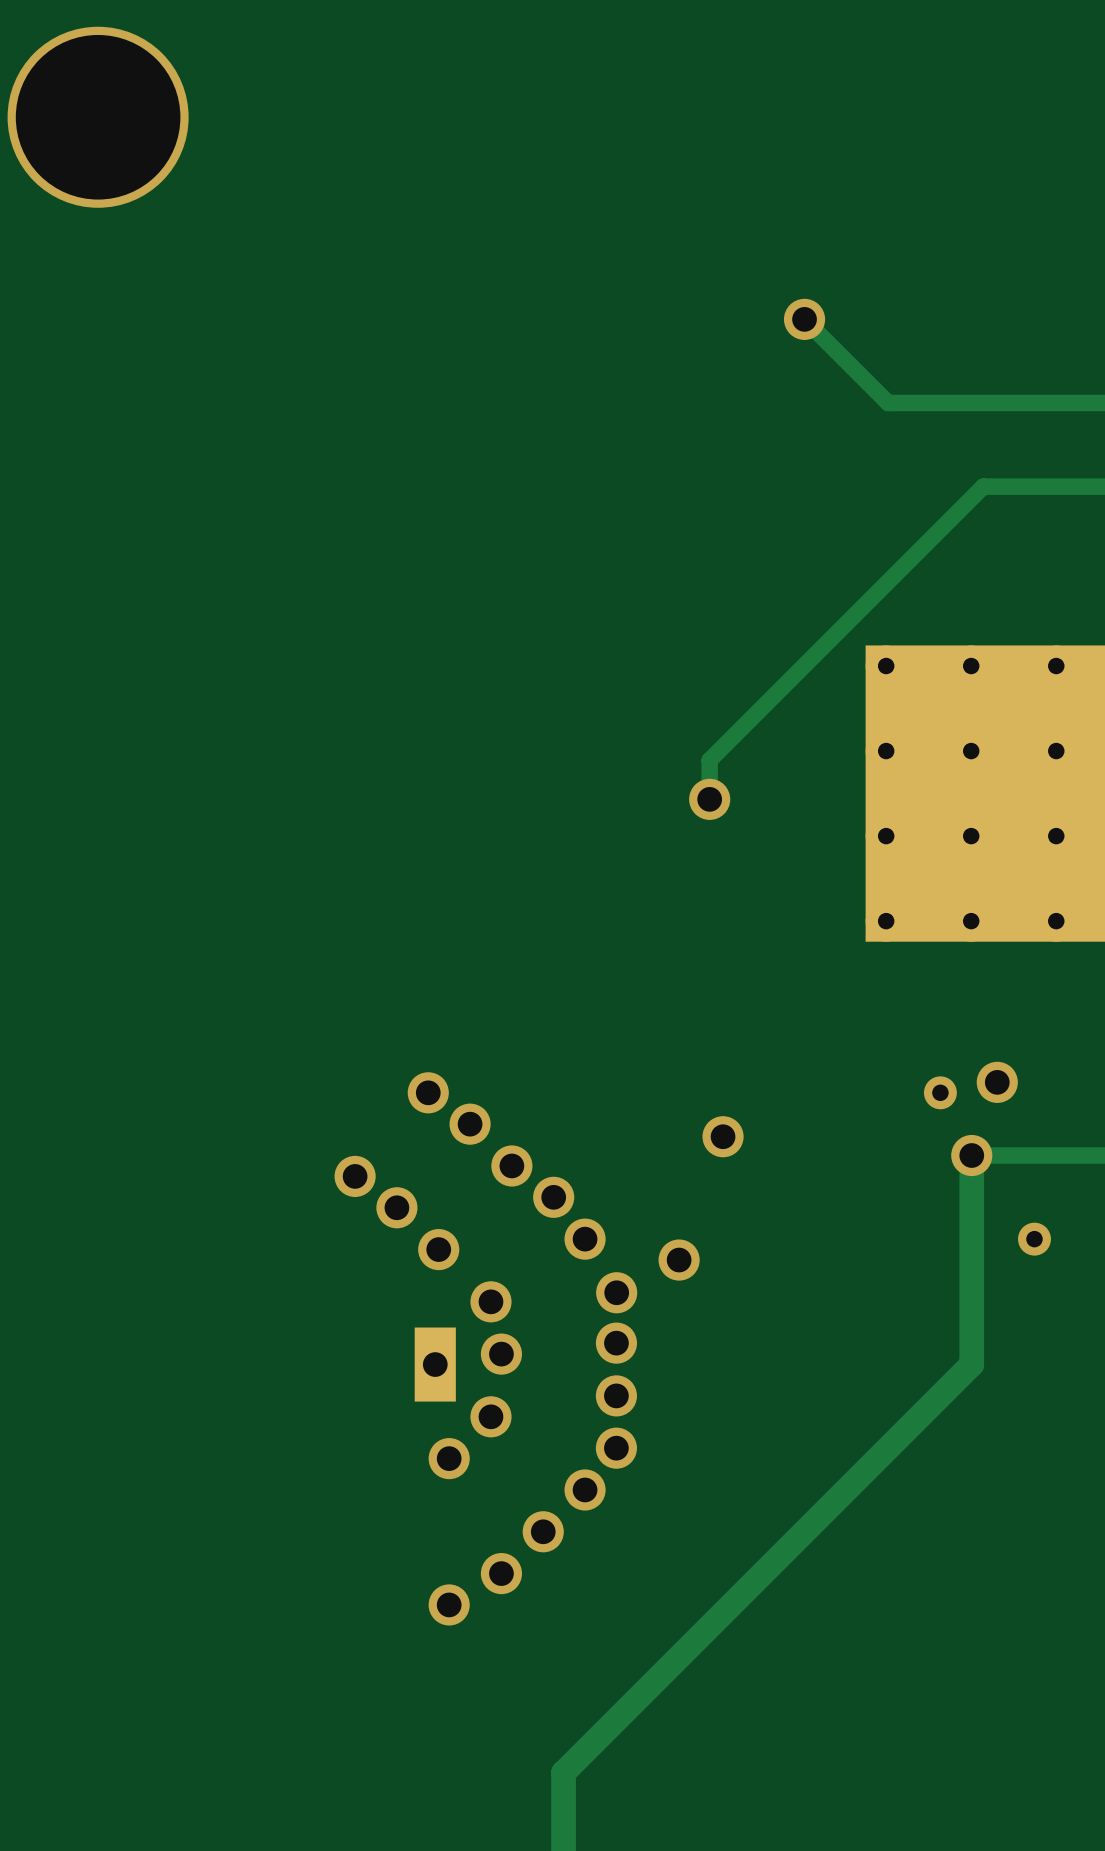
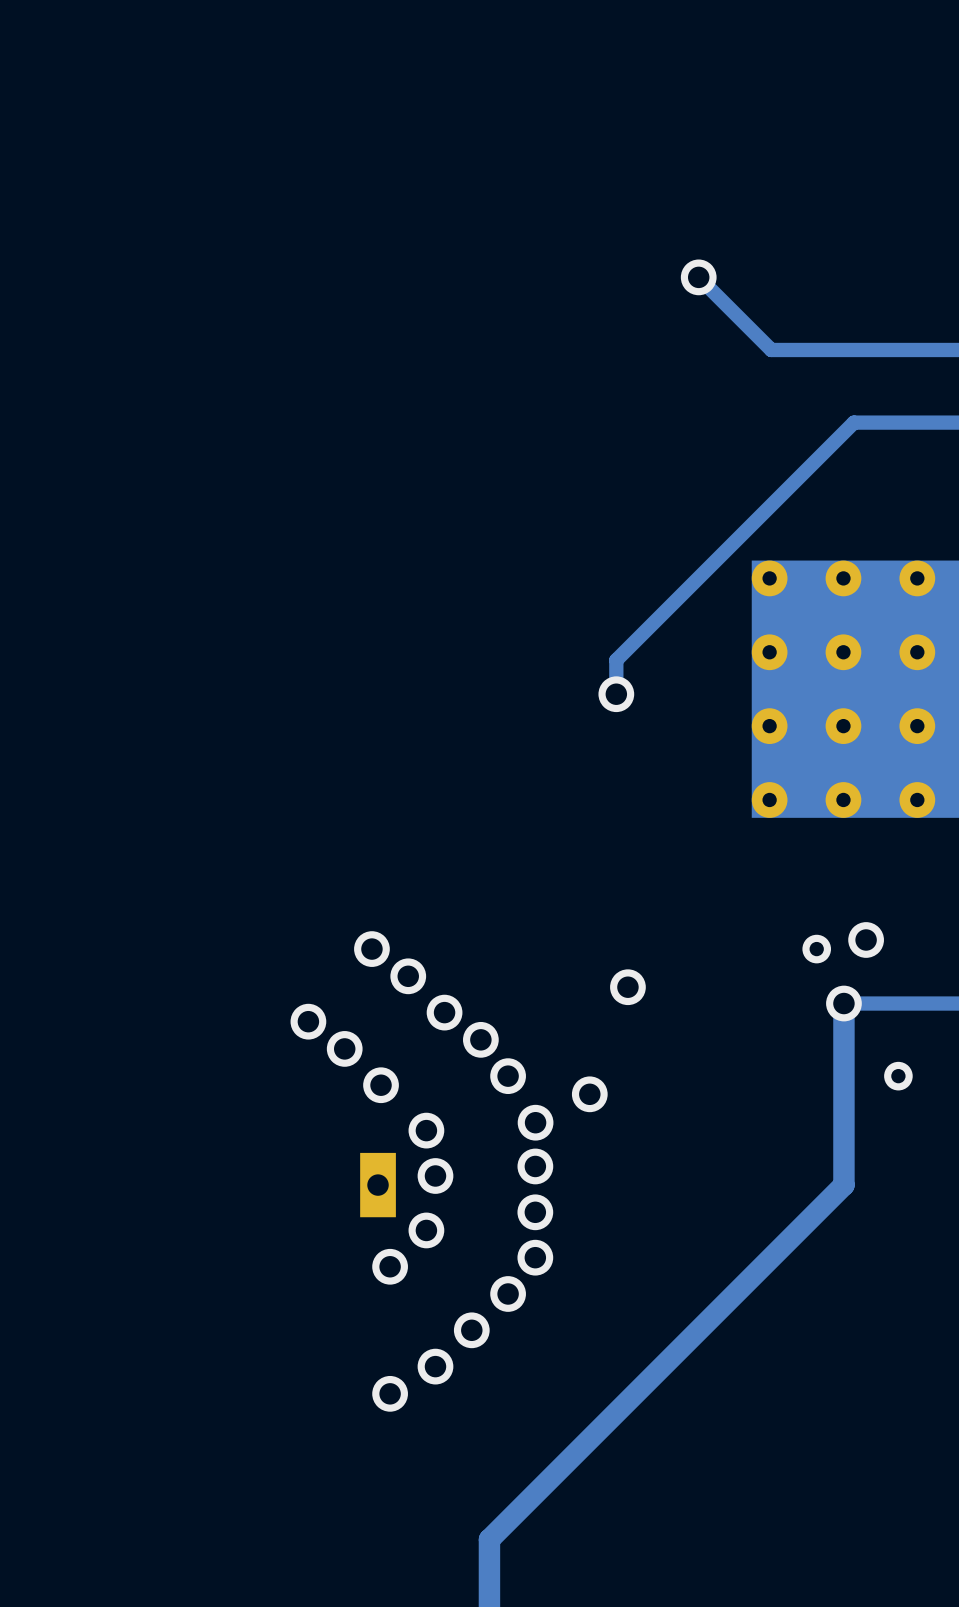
via: (98, 117) -> none

